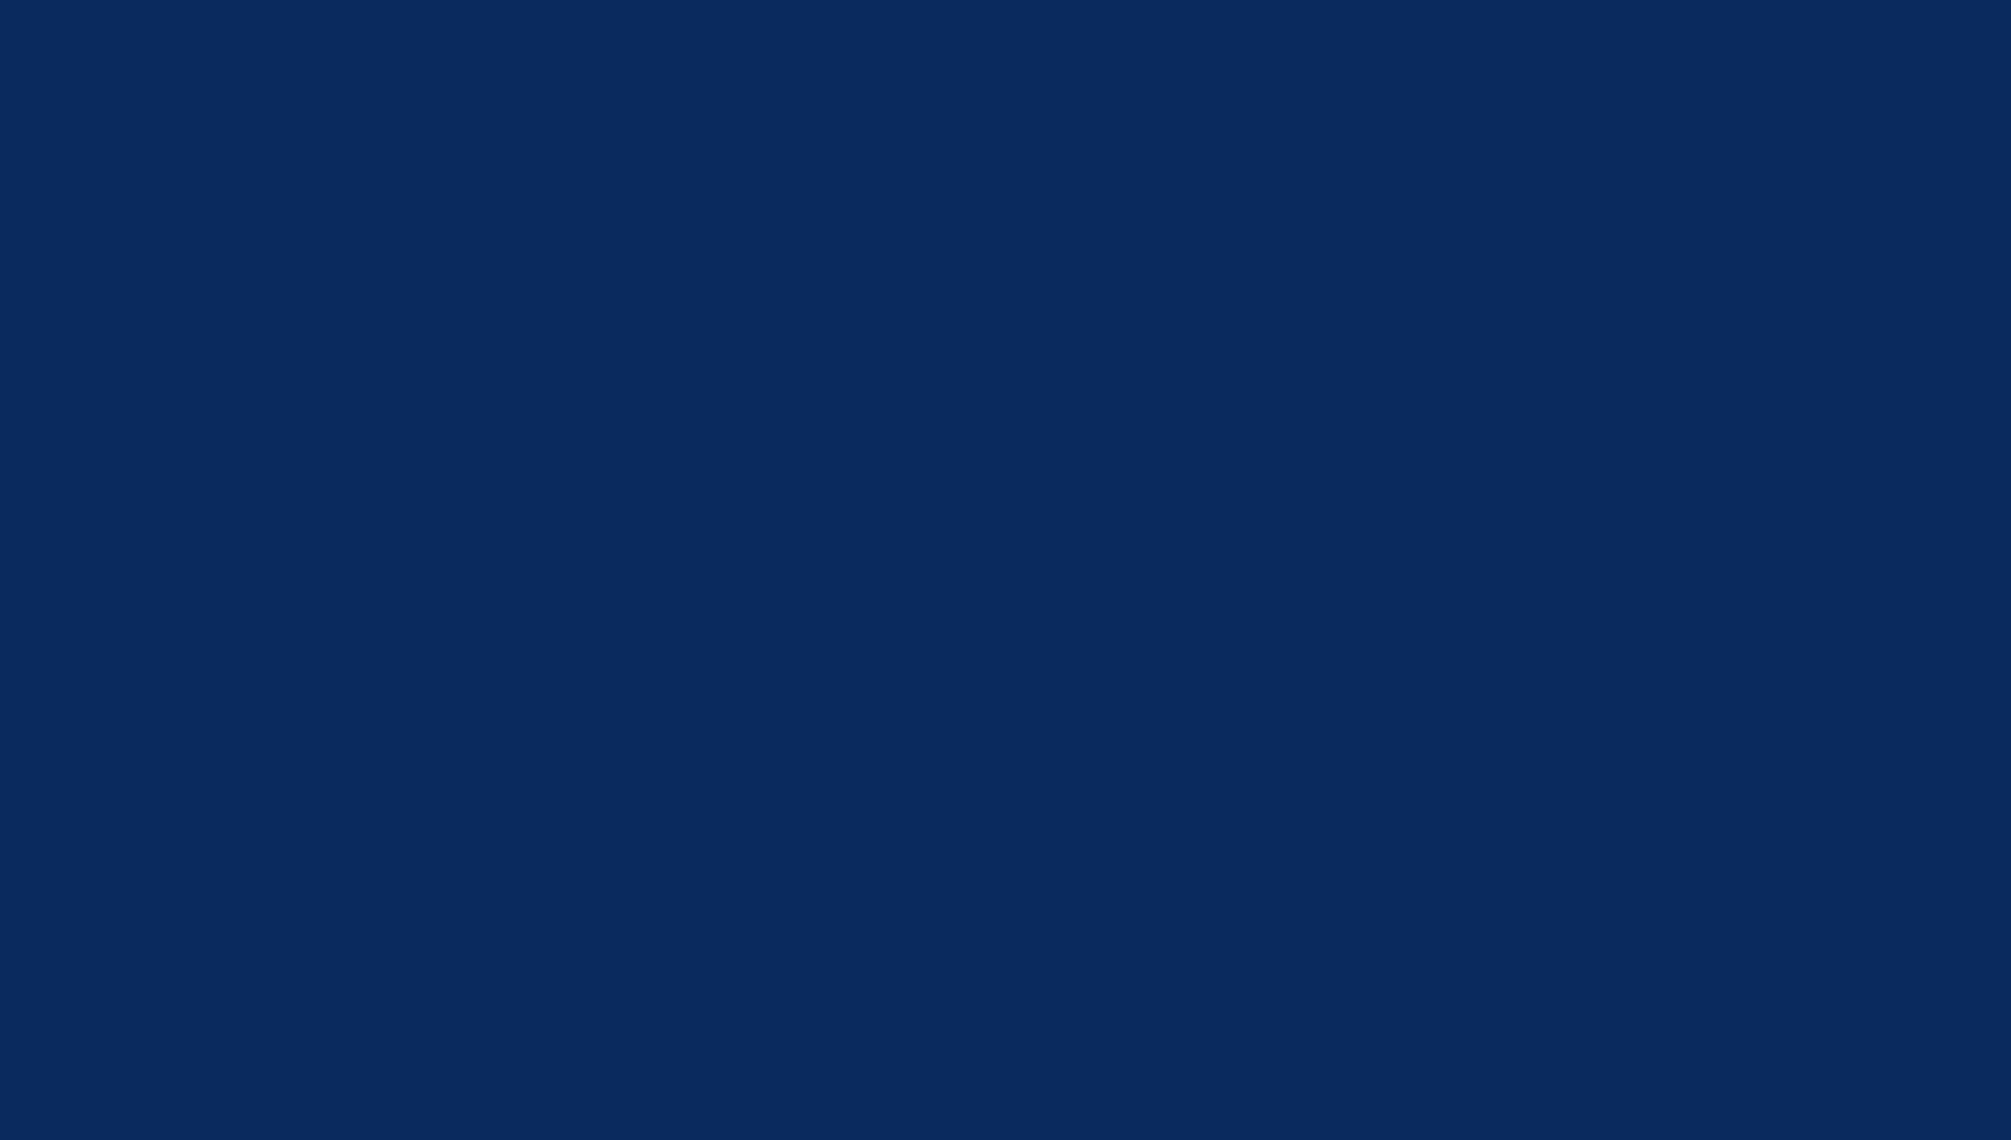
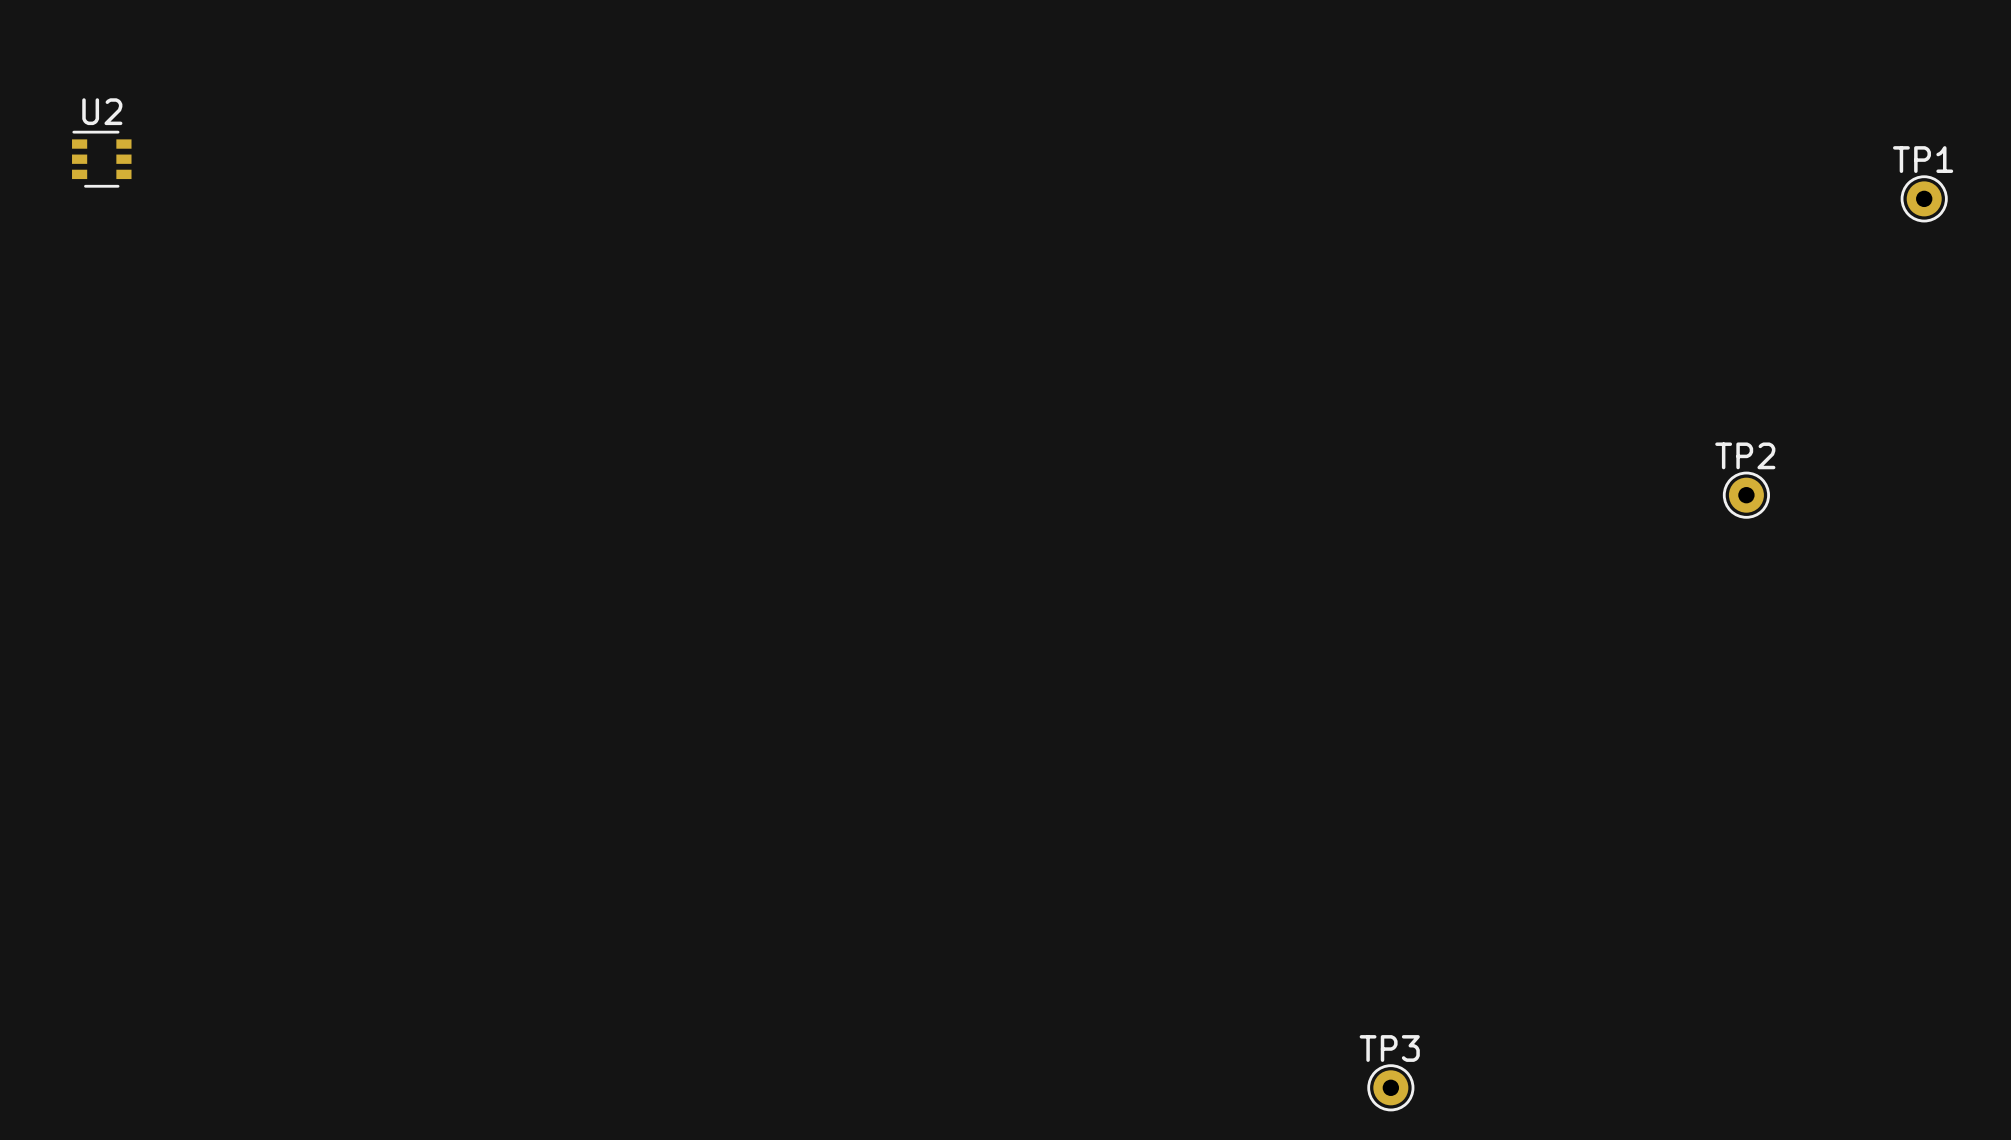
U2: none -> (101, 159)
TP1: none -> (1924, 198)
TP2: none -> (1746, 495)
TP3: none -> (1390, 1087)

